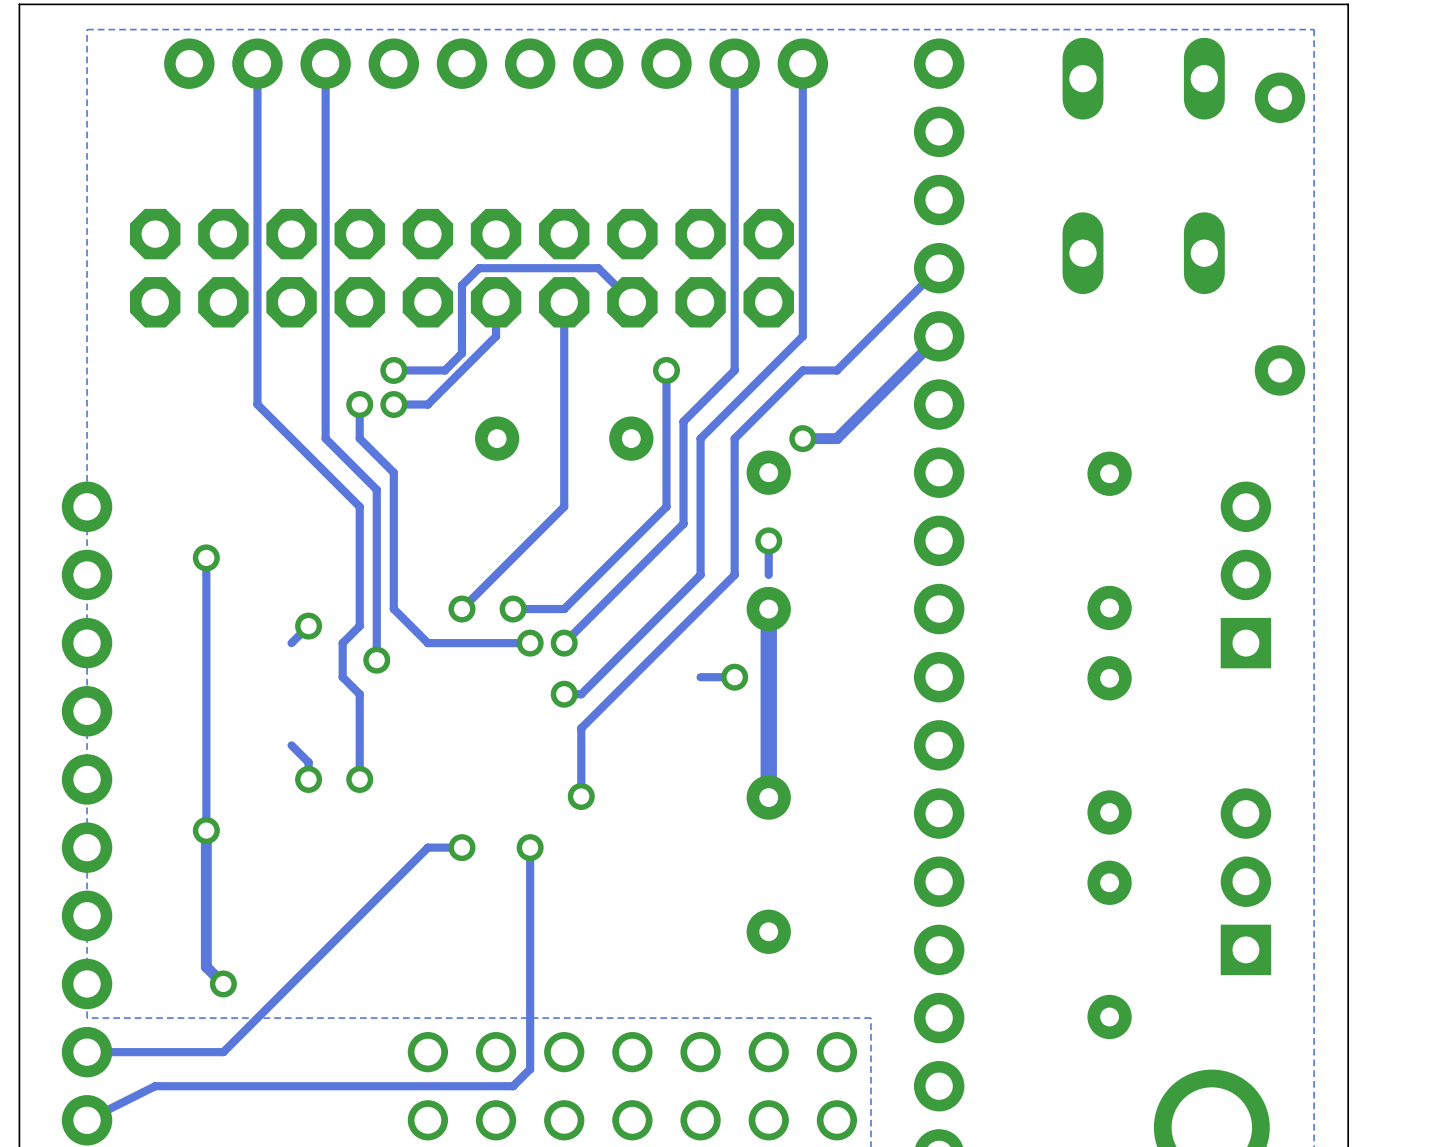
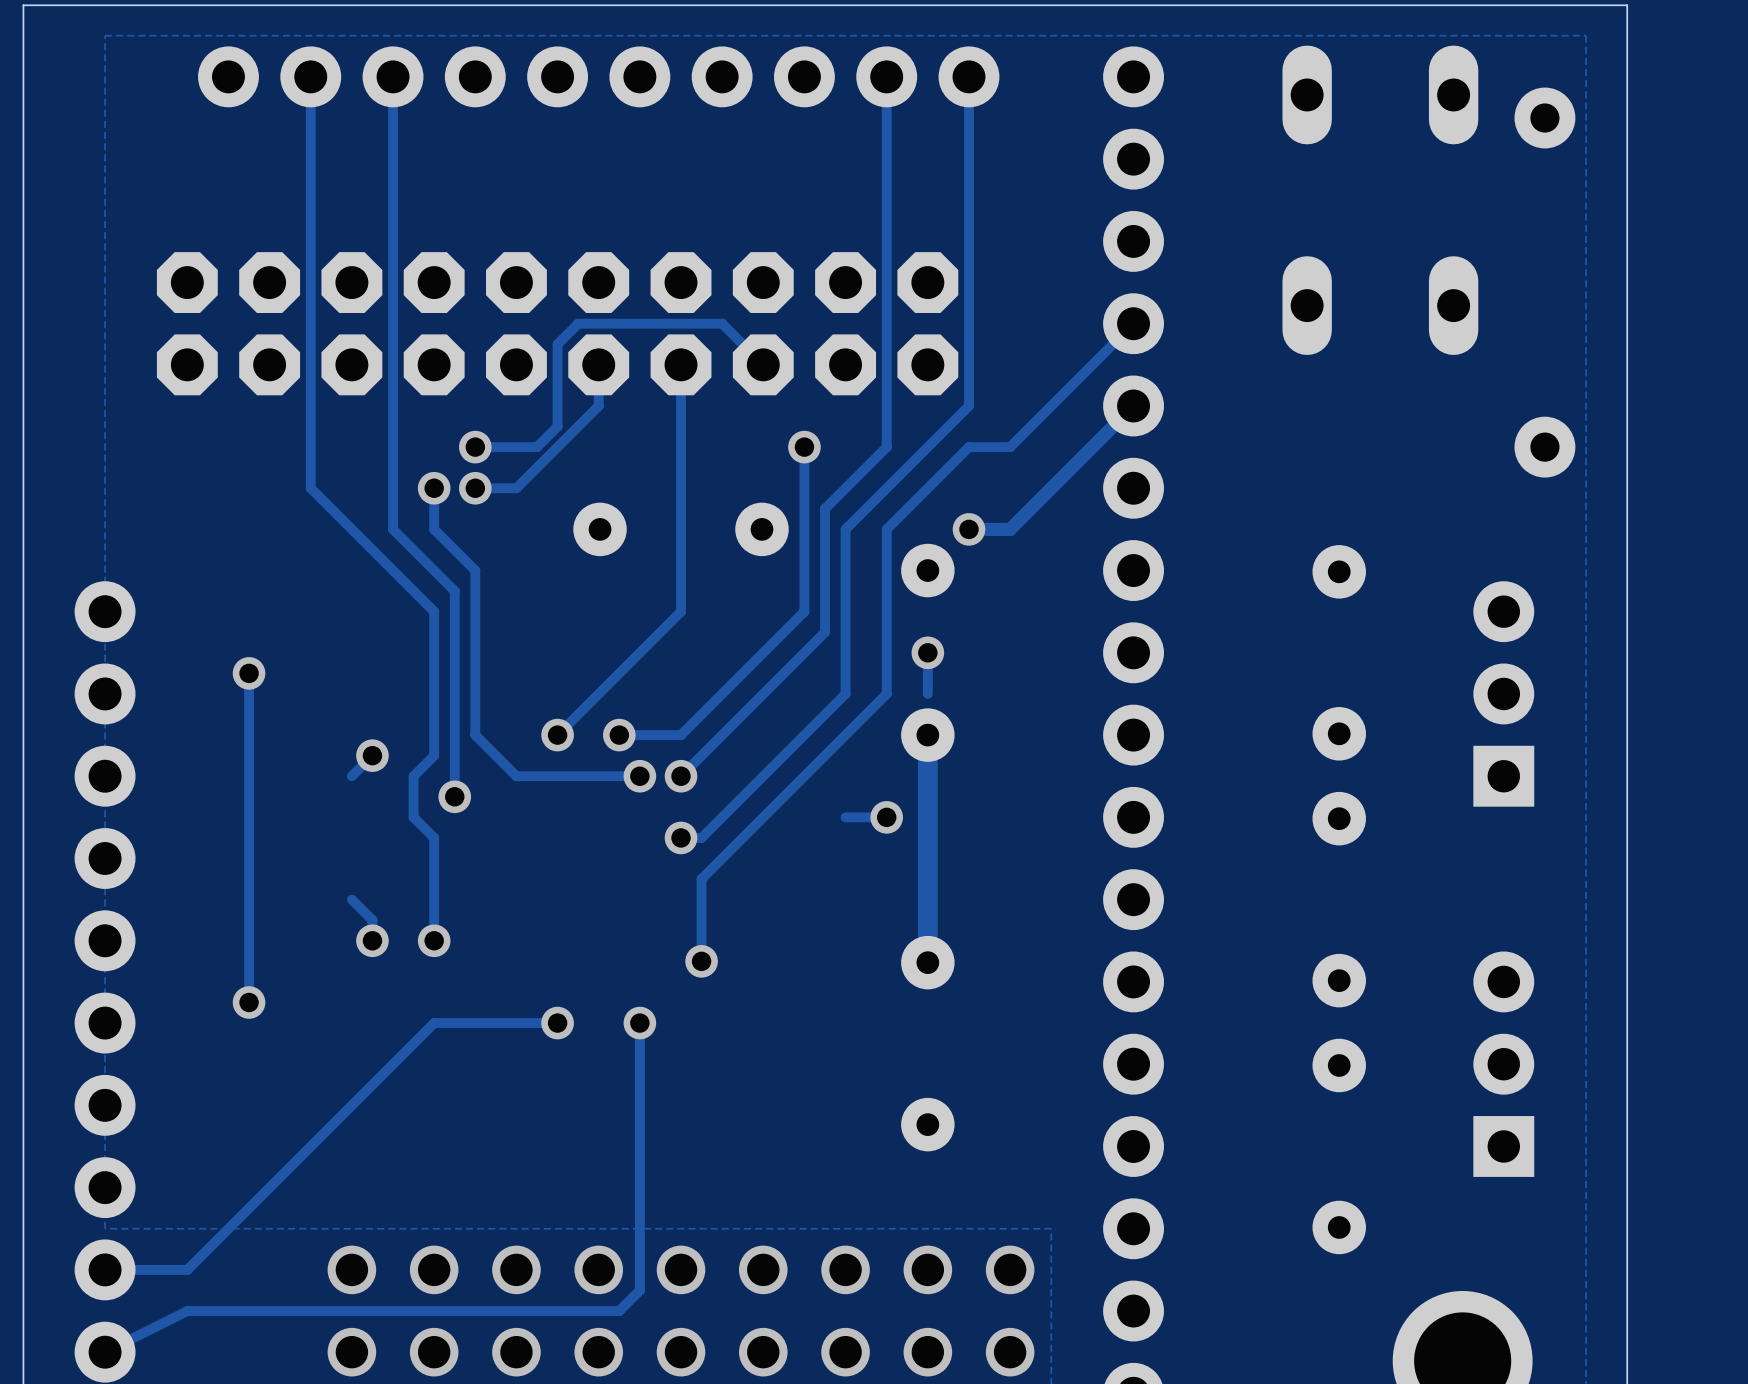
track: (206, 830) (206, 966) (223, 983) -> none
track: (427, 847) (223, 1052) (155, 1052) -> (516, 1023) (434, 1023) (187, 1269)
via: (223, 983) -> none
via: none -> (351, 1269)
via: none -> (434, 1269)
via: none -> (351, 1352)
via: none -> (434, 1352)

